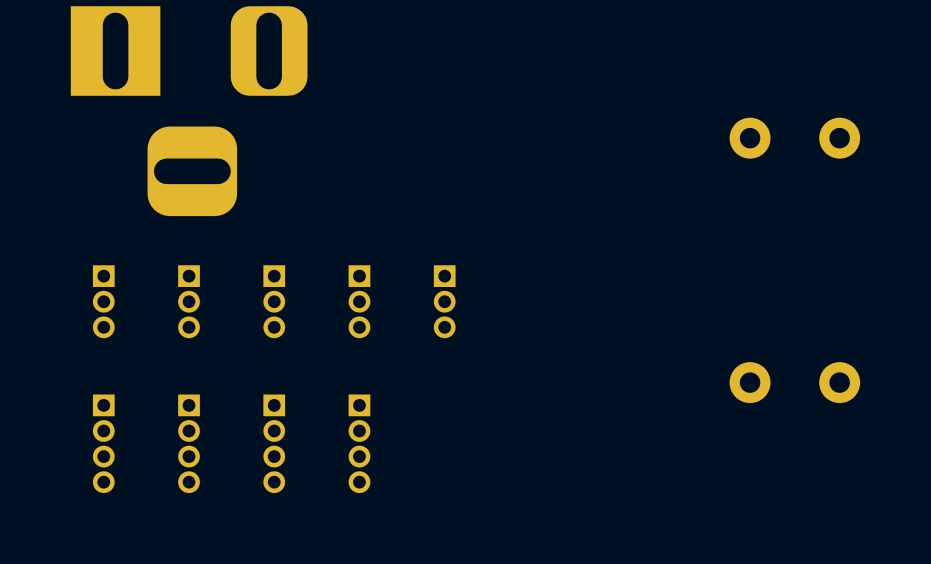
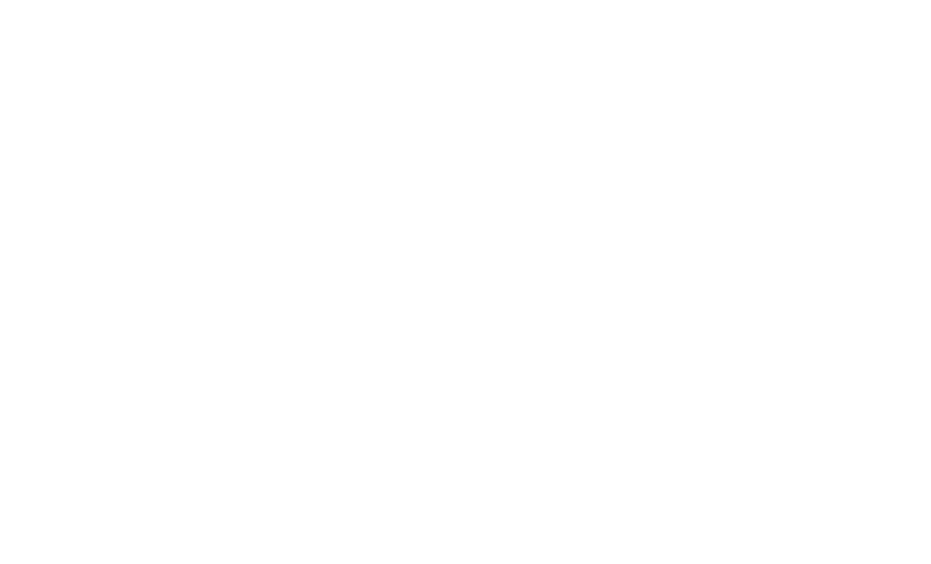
part: (189, 111) -> none
part: (794, 138) -> none
part: (103, 301) -> none
part: (189, 301) -> none
part: (274, 301) -> none
part: (359, 301) -> none
part: (444, 301) -> none
part: (794, 382) -> none
part: (103, 443) -> none
part: (189, 443) -> none
part: (274, 443) -> none
part: (359, 443) -> none

